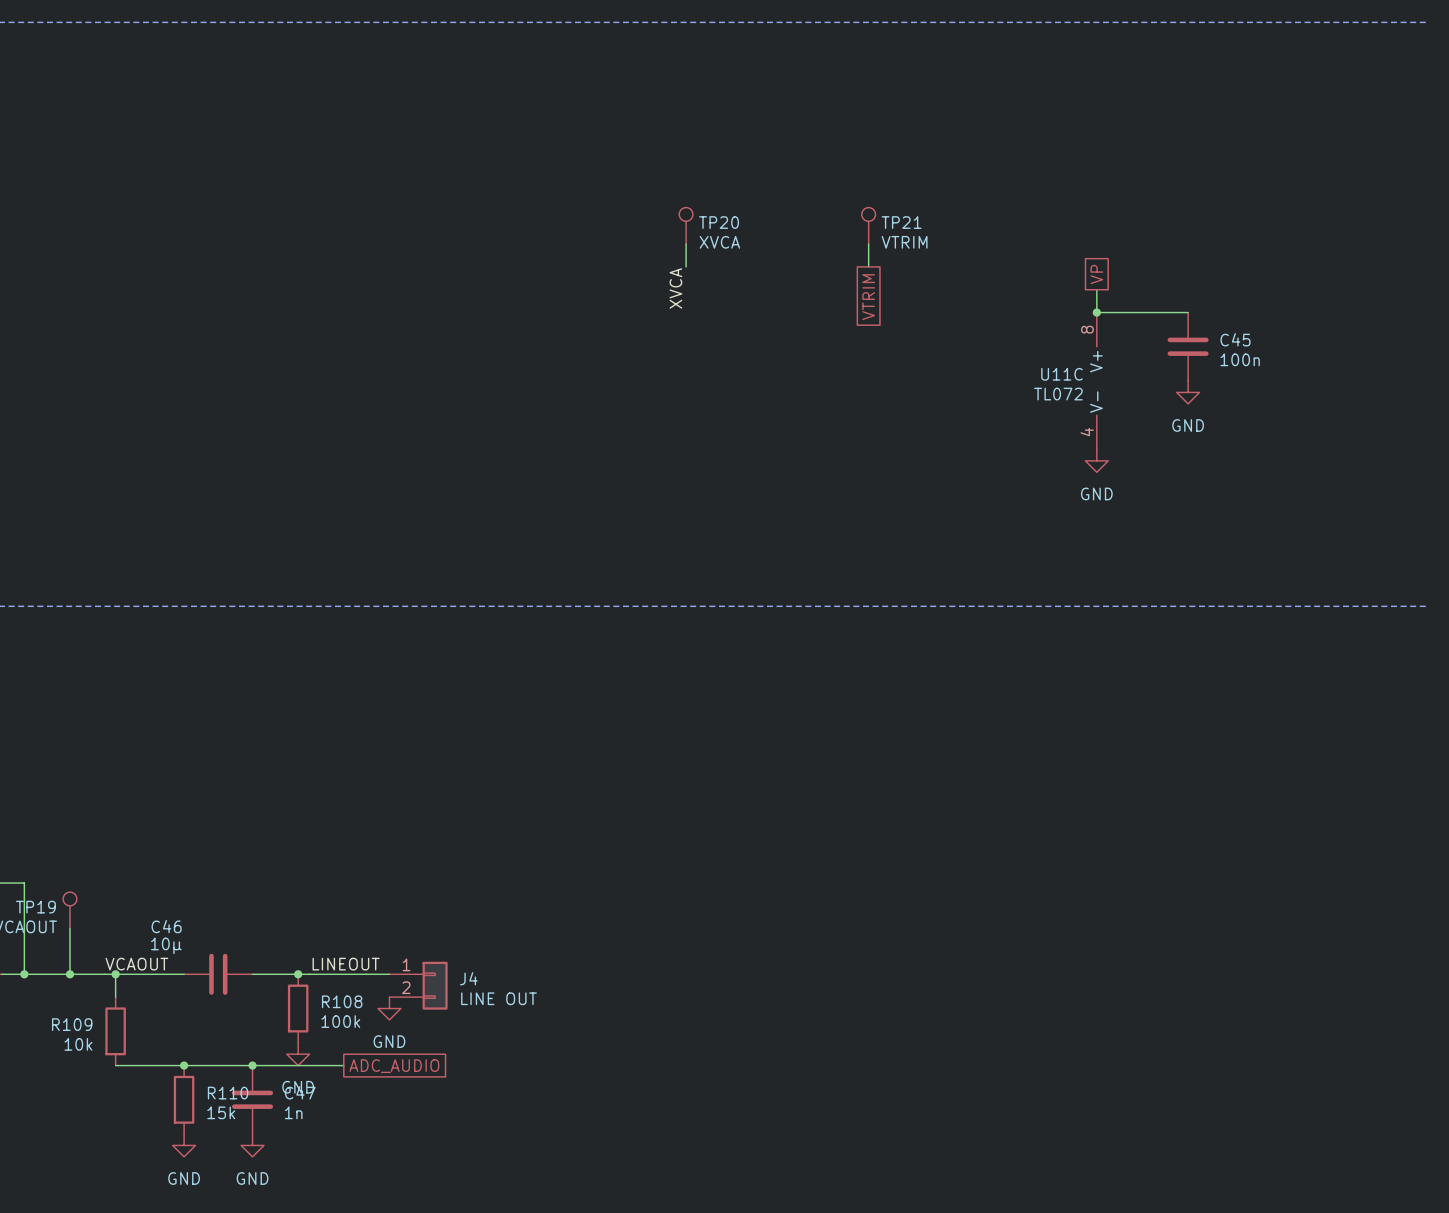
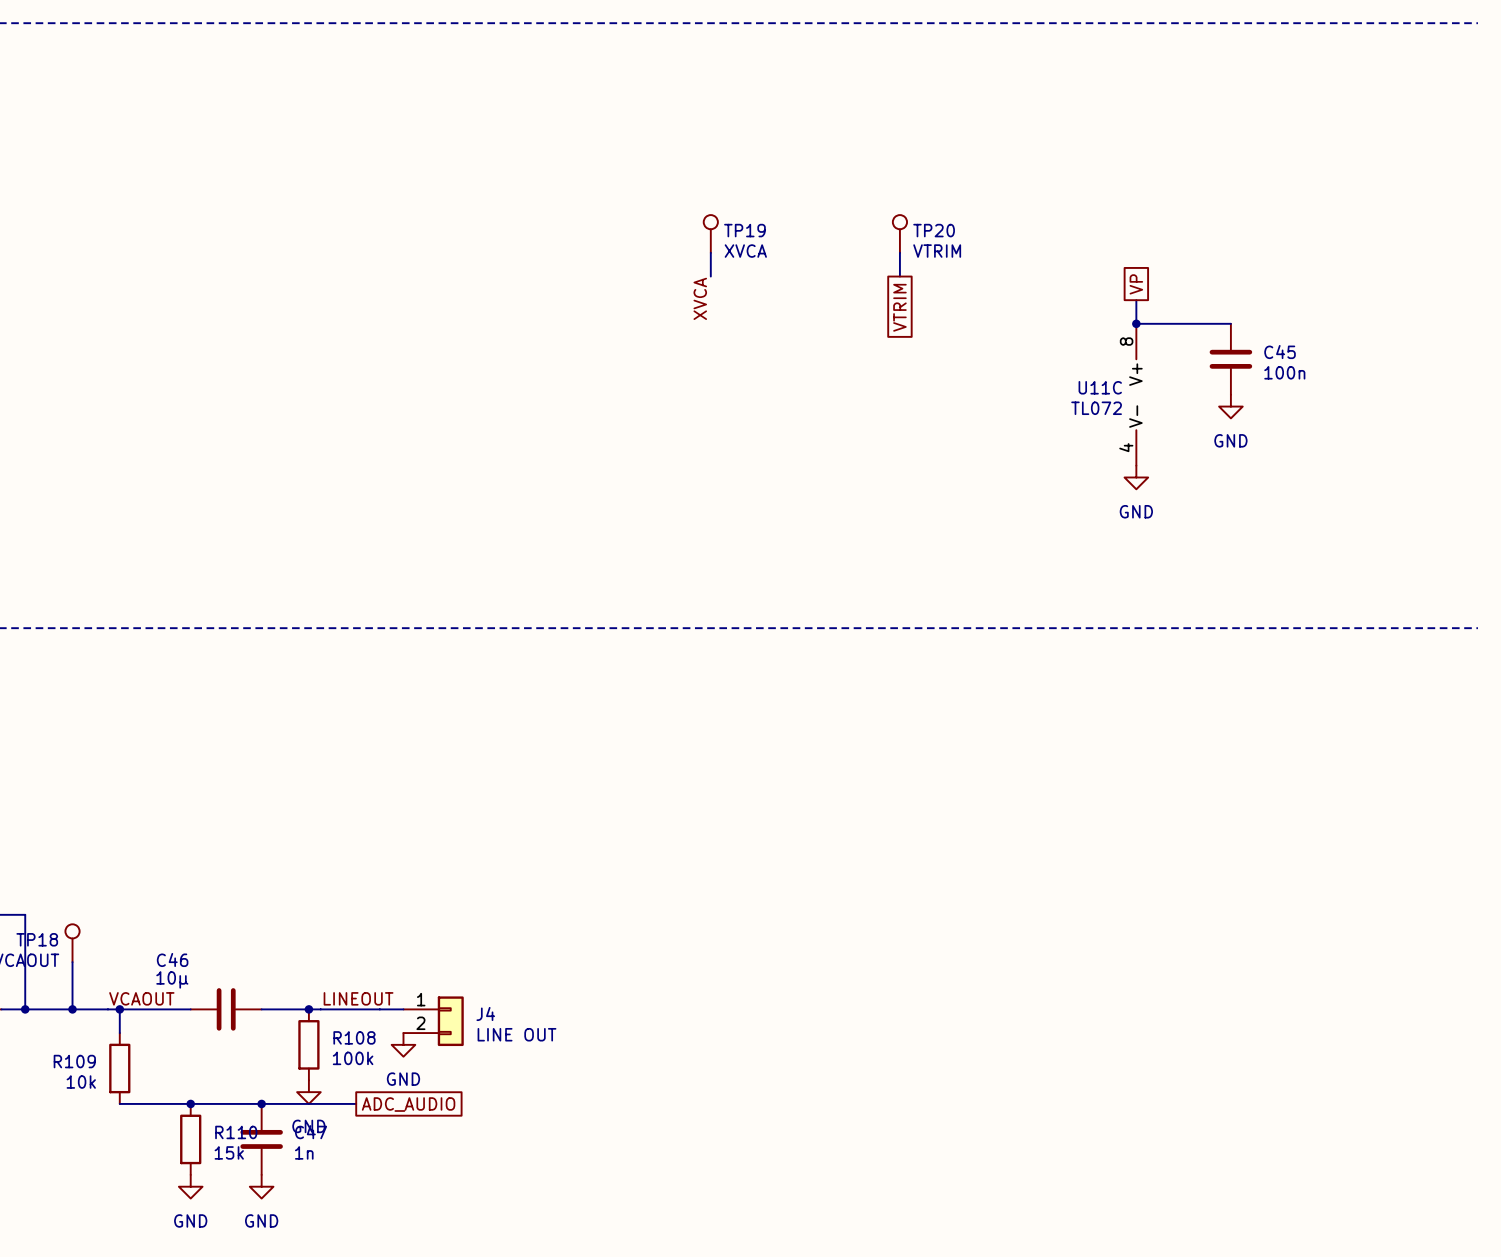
TP20 name: TP20 (719, 222) -> TP19 (744, 230)
TP21 name: TP21 (901, 222) -> TP20 (934, 230)
TP19 name: TP19 (35, 907) -> TP18 (37, 939)

